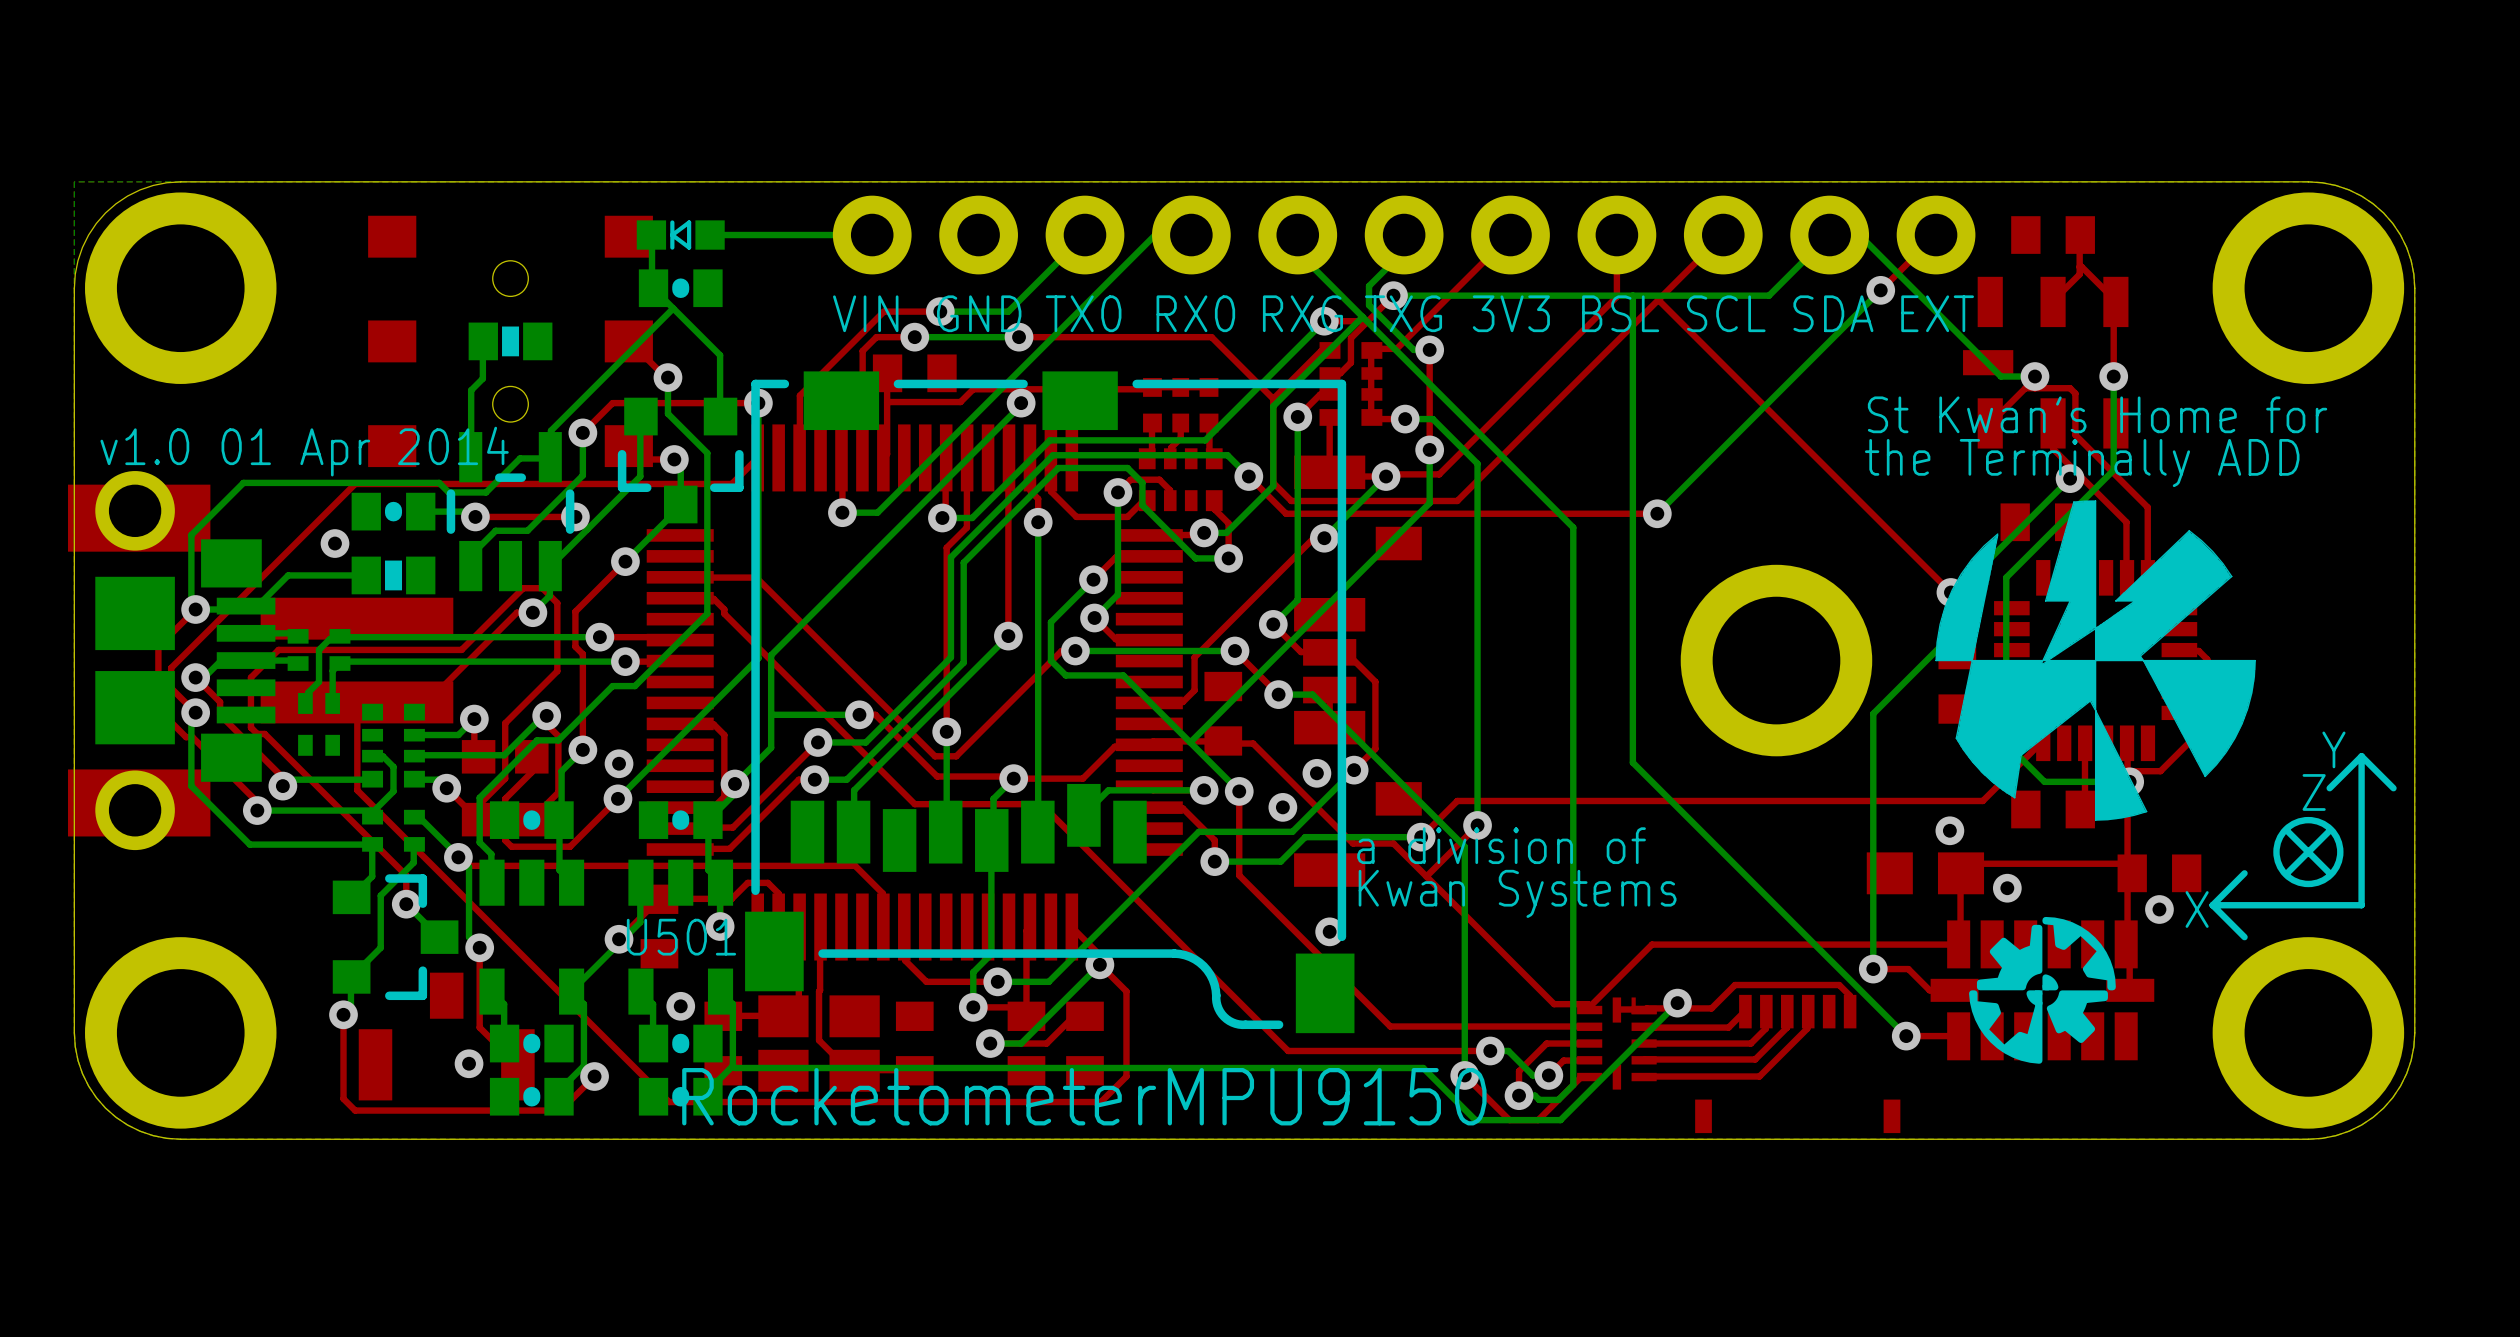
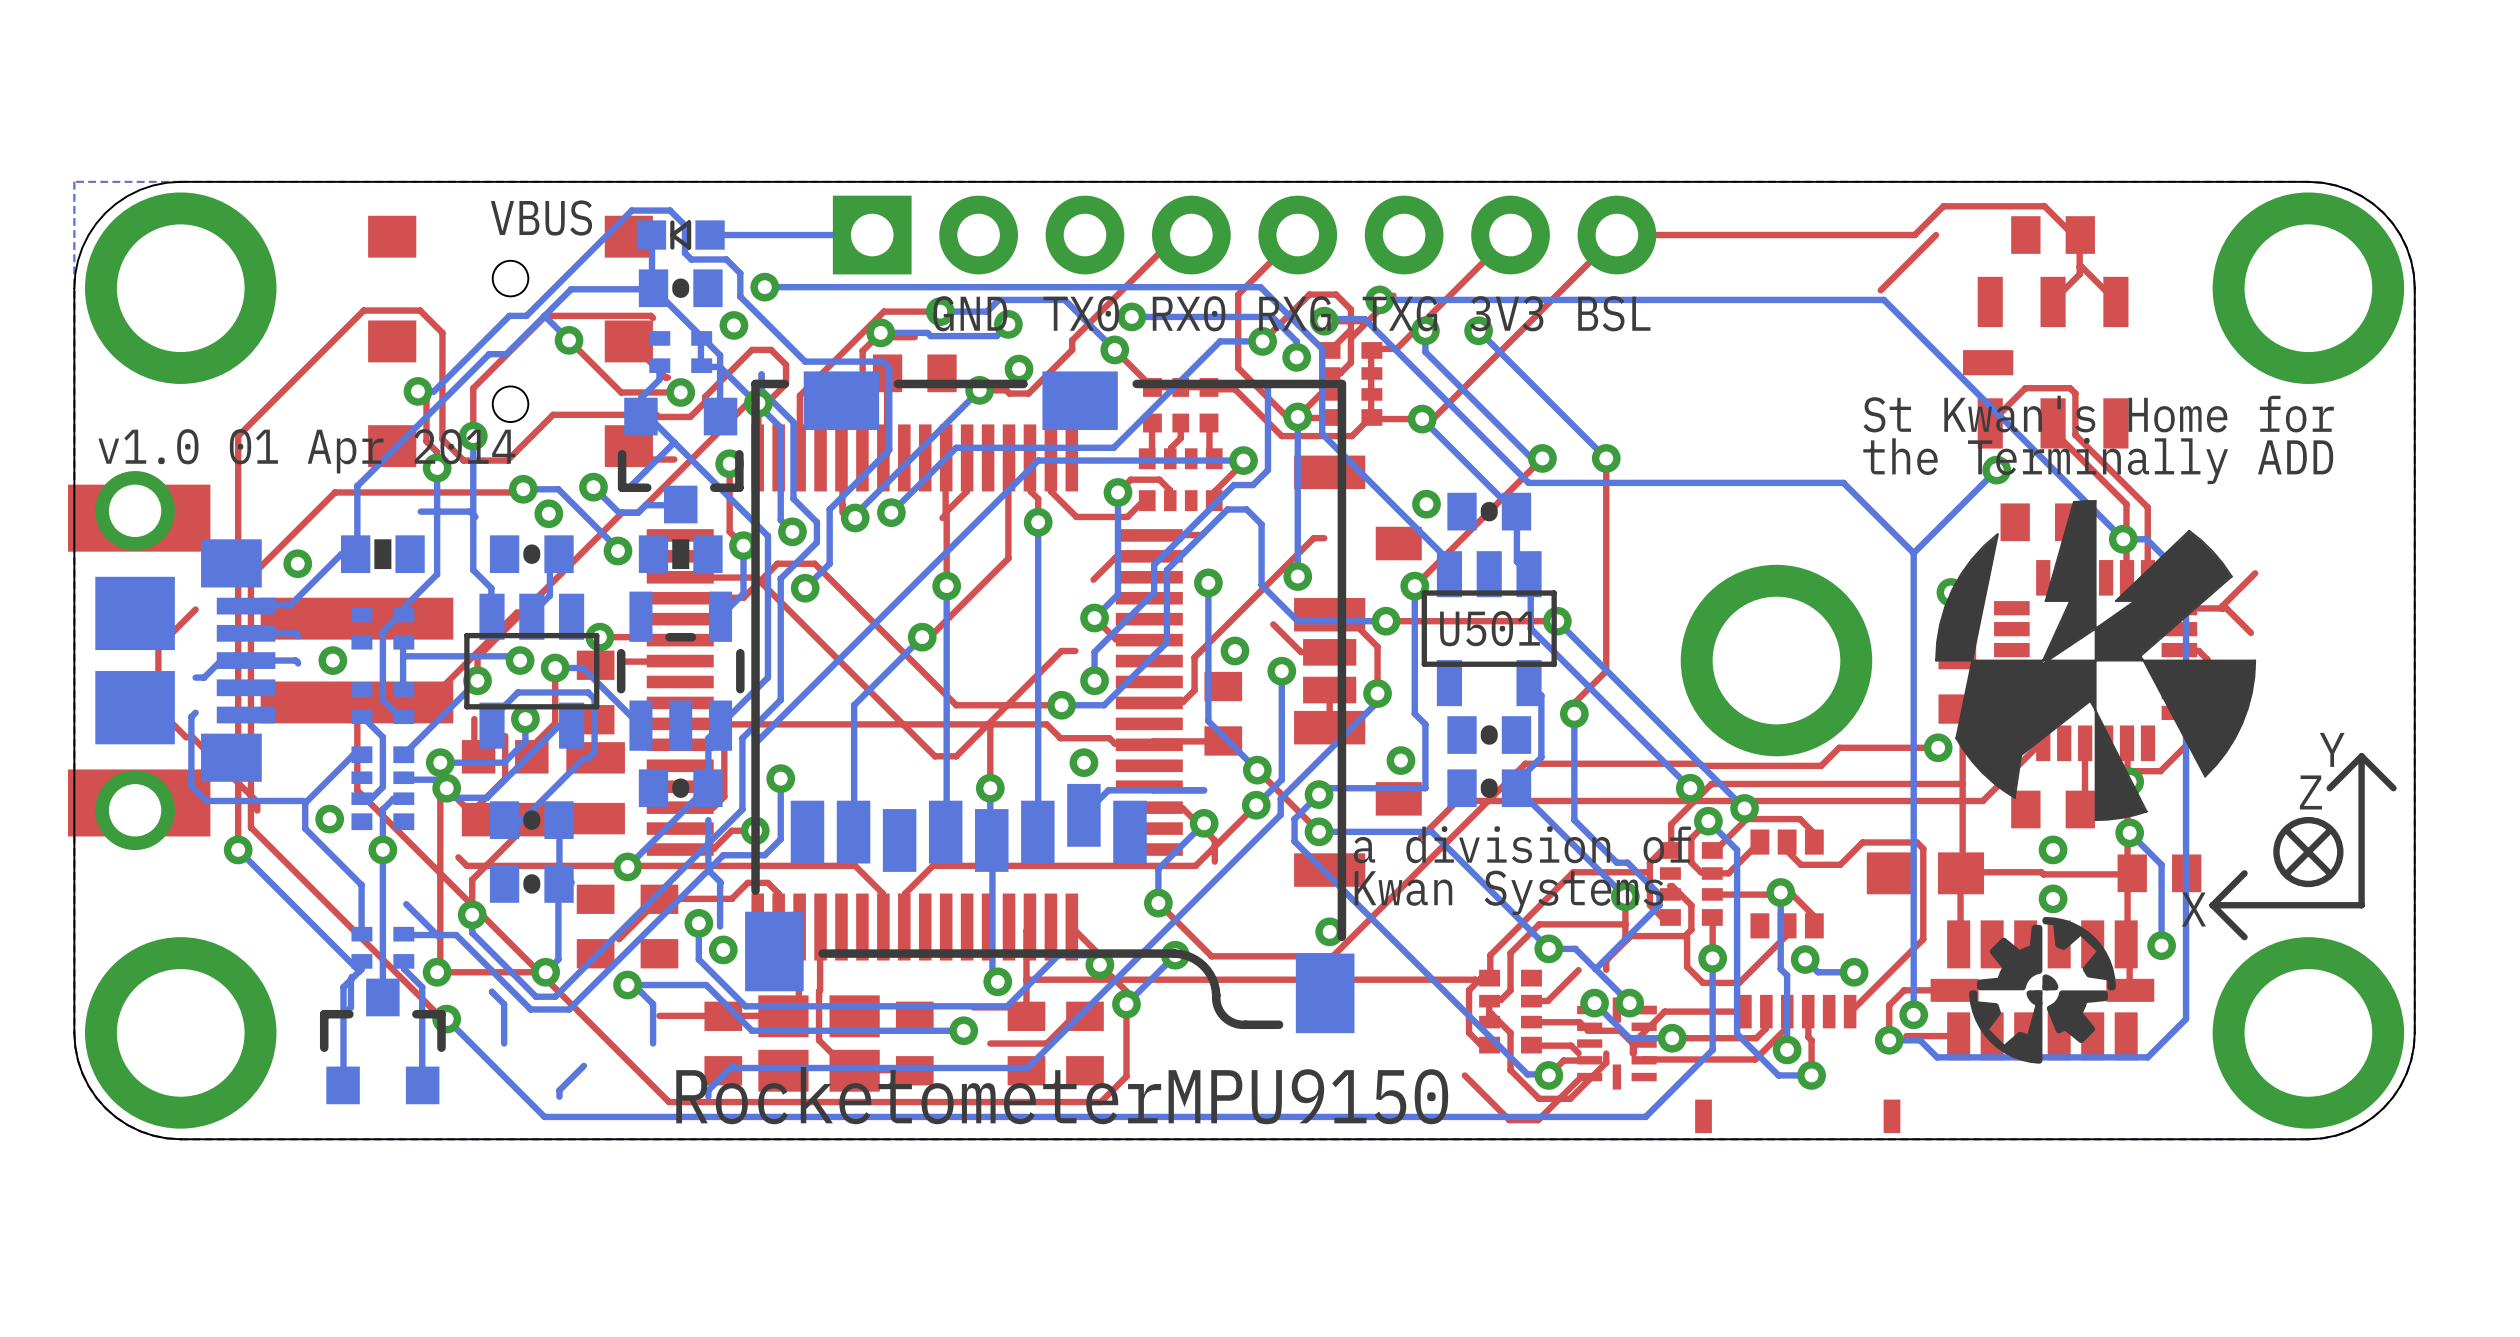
text: none -> VBUS (541, 218)
bottom track: (1084, 235) (1008, 311) (987, 311) -> (1114, 349) (1064, 299) (998, 299) (987, 311)
top track: none -> (1191, 235) (1177, 235) (1072, 340) (1072, 349) (1028, 393) (1009, 393) (1006, 390) (979, 390)
bottom track: (1191, 235) (1155, 235) (877, 512) (842, 512) -> none
part: none -> (1244, 235)
bottom track: (1297, 235) (1297, 252) (1364, 319) -> (1326, 319) (1364, 319)
bottom track: (1404, 235) (1404, 250) (1369, 286) (1369, 305) (1413, 349) (1429, 349) -> none
part: (1404, 235) -> none
top track: (1616, 235) (1616, 296) (1439, 474) (1333, 476) (1329, 472) (1329, 418) -> (1297, 235) (1238, 294) (1238, 368) (1288, 418) (1329, 418)
top track: (1723, 235) (1457, 500) (1291, 500) (1273, 482) (1273, 398) -> none
top track: none -> (2080, 235) (2071, 232) (2044, 206) (1943, 206) (1914, 235) (1616, 235) (1432, 419) (1405, 419)
bottom track: none -> (764, 287) (1260, 287) (1322, 348) (1322, 433) (1448, 560) (1449, 574)
via: none -> (764, 287)
bottom track: (1880, 290) (1657, 513) -> none
via: (1880, 290) -> none
bottom track: (1393, 295) (1769, 295) (1829, 235) (1831, 237) (1861, 237) (2000, 376) (2034, 376) -> none
via position: (1393, 295) -> (1379, 299)
bottom track: (1632, 295) (1632, 762) (1906, 1036) -> none
bottom track: none -> (1379, 299) (1883, 299) (2123, 539) (2146, 539) (2186, 578) (2186, 1019) (2147, 1057) (1937, 1057) (1920, 1040) (1889, 1040)
top track: (1658, 299) (1950, 592) -> none
top track: (2115, 301) (2113, 304) (2113, 376) -> none
bottom track: (673, 308) (550, 430) (550, 457) (520, 458) (486, 492) (448, 492) (439, 482) (243, 482) (191, 535) (191, 605) (195, 609) (241, 609) (243, 607) -> none
text: VIN (865, 313) -> none
text: SCL (1726, 313) -> none
text: SDA (1833, 313) -> none
text: EXT (1937, 313) -> none
bottom track: none -> (544, 315) (569, 340)
bottom track: none -> (1131, 316) (1272, 316) (1296, 341) (1296, 357)
via: none -> (1131, 316)
bottom track: (1362, 316) (1273, 406) (1273, 486) (1226, 532) (1204, 532) -> none
top track: none -> (653, 318) (650, 315) (545, 315) (473, 388) (473, 436)
bottom track: (1324, 321) (1205, 440) (1049, 440) (972, 518) (942, 518) -> none
bottom track: none -> (1008, 324) (996, 336) (930, 336) (927, 332) (880, 332)
via: none -> (733, 325)
bottom track: none -> (1425, 330) (1425, 352) (1531, 458) (1542, 458)
bottom track: none -> (1478, 330) (1606, 458)
via: none -> (1478, 330)
via position: (914, 337) -> (880, 332)
top track: (1019, 337) (1211, 337) (1273, 398) -> none
bottom track: (1019, 337) (914, 337) -> none
via position: (1019, 337) -> (1008, 324)
bottom track: none -> (701, 338) (701, 365) (720, 366) (780, 427) (780, 520) (792, 531)
top track: none -> (569, 340) (621, 392) (680, 392)
via: none -> (569, 340)
bottom track: (482, 341) (482, 378) (471, 390) (470, 457) -> none
part: (510, 341) -> none
bottom track: none -> (1262, 341) (1220, 341) (1113, 447) (956, 447) (891, 512)
via: none -> (1262, 341)
via: none -> (1114, 349)
top track: (1429, 349) (1429, 449) -> none
via position: (1429, 349) -> (1425, 330)
top track: (1329, 350) (1321, 350) (1273, 398) -> (1330, 350) (1350, 329) (1350, 309) (1336, 294) (1309, 294) (1262, 341)
part: none -> (680, 352)
via: none -> (1296, 357)
bottom track: none -> (659, 365) (659, 379) (641, 397) (641, 415)
via: none -> (1019, 369)
top track: none -> (761, 374) (761, 389) (638, 512) (622, 512) (477, 657) (477, 680)
bottom track: none -> (761, 374) (761, 390) (793, 422) (793, 498) (816, 522) (816, 542) (780, 578) (780, 699) (742, 738) (742, 809) (555, 996) (536, 996) (472, 932) (472, 914)
via: (2034, 376) -> none
bottom track: (2113, 376) (2113, 470) (2006, 577) (2006, 739) (1996, 741) (2004, 741) (2044, 781) (2129, 781) -> none
via: (2113, 376) -> none
bottom track: (667, 377) (667, 413) (707, 453) (707, 613) (634, 686) (612, 686) (558, 740) (537, 740) (479, 797) (479, 842) (491, 854) (492, 882) -> none
via position: (667, 377) -> (680, 392)
bottom track: none -> (1262, 382) (1267, 388) (1267, 470) (1253, 485) (1233, 485) (1154, 564) (1154, 592) (1094, 652) (1094, 680)
top track: (1152, 387) (1149, 389) (973, 389) (960, 402) (887, 402) -> (1152, 387) (1114, 349)
top track: none -> (1209, 387) (1211, 389) (1234, 389) (1281, 436) (1352, 436) (1371, 417)
bottom track: none -> (979, 390) (855, 514) (855, 518)
via: none -> (979, 390)
top track: none -> (417, 391) (426, 399) (426, 441) (437, 452) (437, 468)
bottom track: none -> (417, 391) (433, 391) (509, 315) (526, 315) (631, 210) (670, 210) (684, 225) (684, 253) (691, 259) (726, 259) (740, 273) (740, 296) (805, 361) (882, 361) (889, 368) (889, 449) (829, 509) (829, 563) (805, 588)
via: none -> (417, 391)
top track: (758, 403) (612, 403) (582, 432) -> none
bottom track: (758, 403) (758, 658) (617, 798) -> none
bottom track: (1021, 403) (771, 655) (771, 747) (734, 783) (734, 793) (707, 820) -> none
via: (1021, 403) -> none
bottom track: (640, 416) (640, 476) -> (674, 442) (640, 476)
bottom track: none -> (640, 416) (647, 415) (767, 536) (767, 677) (708, 738) (708, 788)
bottom track: (1405, 419) (1432, 419) (1477, 463) (1477, 825) -> none
via position: (1405, 419) -> (1422, 419)
bottom track: none -> (1422, 419) (1516, 511)
top track: (2053, 430) (2053, 448) (2126, 522) -> (2053, 430) (2126, 504) (2126, 522)
bottom track: (582, 432) (582, 475) (527, 530) (495, 530) (471, 555) (471, 565) -> none
via: (582, 432) -> none
bottom track: none -> (473, 436) (473, 570) (491, 588) (492, 616)
via: none -> (473, 436)
bottom track: (1429, 449) (1429, 503) (1190, 742) -> none
via: (1429, 449) -> none
top track: (757, 458) (731, 483) (355, 483) (171, 668) (171, 688) (195, 712) -> (757, 457) (758, 411) (786, 383) (786, 364) (771, 349) (752, 349) (705, 396) (705, 402) (690, 416) (658, 416) (656, 414) (553, 414) (507, 460) (463, 460) (442, 439) (442, 332) (420, 310) (363, 310) (238, 436) (238, 849)
top track: none -> (1542, 458) (1414, 586)
via: none -> (1542, 458)
top track: none -> (1606, 458) (1606, 671) (1574, 703) (1574, 713)
via: none -> (1606, 458)
bottom track: (674, 459) (680, 465) (679, 507) (625, 561) -> none
via: (674, 459) -> none
bottom track: none -> (1243, 460) (1038, 460) (755, 743) (755, 830)
top track: none -> (729, 463) (729, 531) (743, 545)
via: none -> (729, 463)
bottom track: none -> (437, 468) (437, 574) (405, 606) (403, 615) (398, 615) (382, 631) (382, 699) (398, 715) (403, 716)
via: none -> (437, 468)
bottom track: none -> (1996, 470) (1913, 553)
via: none -> (1996, 470)
top track: (1248, 476) (1286, 513) (1657, 513) -> none
bottom track: (1248, 476) (1227, 455) (1053, 455) (950, 557) (950, 657) (865, 742) (817, 742) -> none
via position: (1248, 476) -> (1243, 460)
bottom track: (1386, 476) (1324, 538) -> none
via: (1386, 476) -> none
bottom track: (2070, 478) (1953, 595) -> none
via: (2070, 478) -> none
bottom track: (1528, 482) (1573, 527) (1573, 1085) (1558, 1099) (1539, 1099) (1534, 1095) (1519, 1095) -> (1528, 482) (1843, 482) (1913, 553)
bottom track: none -> (593, 487) (619, 512) (638, 512) (645, 505) (680, 505)
via: none -> (593, 487)
bottom track: (628, 488) (550, 565) -> none
bottom track: none -> (523, 489) (558, 489) (617, 550)
via: none -> (523, 489)
top track: (966, 491) (966, 527) (946, 547) -> (966, 491) (946, 511) (946, 547)
top track: (1214, 500) (1214, 509) (1228, 523) (1228, 558) -> (1214, 500) (1214, 491) (1243, 460)
via: none -> (1426, 504)
part position: (393, 511) -> (531, 554)
part position: (510, 511) -> (680, 671)
part: none -> (1489, 511)
bottom track: none -> (1516, 511) (1516, 561) (1530, 576) (1530, 628) (1690, 788)
via position: (842, 512) -> (855, 518)
via: none -> (891, 512)
via: (1657, 513) -> none
via: (475, 516) -> none
top track: (575, 516) (475, 516) -> none
via position: (575, 516) -> (548, 513)
via: (942, 518) -> none
via: none -> (792, 531)
via: (1204, 532) -> none
via: (1324, 538) -> none
via: none -> (2123, 539)
via position: (334, 543) -> (297, 563)
bottom track: none -> (743, 545) (743, 593) (720, 616)
via: none -> (743, 545)
bottom track: none -> (1913, 553) (1913, 1014)
part: none -> (680, 554)
top track: (1008, 558) (1008, 636) -> (1008, 558) (929, 637) (922, 637)
bottom track: (1228, 558) (1195, 558) (1142, 505) (1142, 482) (1127, 468) (1058, 468) (963, 562) (963, 662) (846, 779) (814, 779) -> none
via position: (1228, 558) -> (1208, 582)
top track: (625, 561) (575, 611) (575, 646) (582, 654) (582, 749) -> none
via position: (625, 561) -> (617, 550)
top track: none -> (2255, 573) (2222, 608)
bottom track: (366, 575) (288, 575) (258, 605) -> (653, 288) (571, 289) (506, 354) (489, 354) (357, 486) (357, 552) (355, 554) (341, 554) (290, 605) (258, 605)
part position: (393, 575) -> (382, 554)
bottom track: (1297, 576) (1297, 599) (1273, 624) -> none
via: none -> (1297, 576)
bottom track: (1093, 579) (1050, 622) (1050, 660) (1065, 675) (1123, 675) (1239, 791) -> none
via: (1093, 579) -> none
bottom track: none -> (1208, 582) (1208, 721) (1257, 770)
top track: (946, 586) (946, 731) -> none
bottom track: none -> (946, 586) (946, 731)
via: none -> (946, 586)
via: none -> (1414, 586)
via: none -> (805, 588)
bottom track: (1953, 595) (1953, 633) (1873, 713) (1873, 969) -> none
top track: (680, 598) (713, 598) (724, 609) (724, 613) (914, 804) (1041, 804) (1288, 1050) (1490, 1050) -> (680, 597) (743, 597) (777, 563) (814, 563) (956, 705) (1061, 705)
top track: none -> (2179, 608) (2226, 608) (2250, 632)
via: (195, 609) -> none
via: (532, 612) -> none
top track: none -> (1329, 614) (1345, 614) (1377, 646) (1377, 693)
bottom track: none -> (1386, 621) (1297, 621) (1261, 585) (1261, 524) (1246, 509) (1227, 509) (1166, 570) (1166, 642) (1104, 705) (1061, 705)
via: none -> (1386, 621)
top track: none -> (1557, 621) (1386, 621)
bottom track: none -> (1557, 621) (1744, 808)
via: none -> (1557, 621)
via: (1273, 624) -> none
part: none -> (382, 628)
bottom track: (1008, 636) (854, 790) -> (922, 637) (854, 705) (854, 790)
via: (1008, 636) -> none
bottom track: (599, 637) (339, 636) (329, 639) (319, 649) (319, 681) (308, 692) (308, 703) (305, 703) -> none
via: none -> (922, 637)
bottom track: none -> (403, 642) (403, 689)
part: (319, 649) -> none
via: (1075, 650) -> none
top track: (1234, 650) (1278, 694) -> none
bottom track: (1234, 650) (1075, 650) -> none
top track: (1329, 652) (1331, 654) (1347, 654) (1375, 681) (1375, 748) (1354, 770) -> none
bottom track: none -> (403, 656) (515, 656) (520, 660)
via: none -> (332, 660)
via: none -> (520, 660)
bottom track: (625, 661) (342, 661) (332, 670) (332, 703) -> none
via: (625, 661) -> none
bottom track: none -> (555, 668) (582, 668) (640, 725)
via: none -> (555, 668)
part: none -> (531, 671)
bottom track: none -> (1281, 671) (1281, 779) (1256, 805)
top track: (195, 677) (220, 702) (220, 714) (282, 777) (282, 786) -> none
via: (195, 677) -> none
top track: (250, 677) (278, 649) (461, 649) (523, 588) (542, 588) (557, 603) (557, 671) (505, 723) (505, 736) -> (250, 677) (250, 576) (334, 492) (520, 492) (523, 489)
bottom track: none -> (477, 680) (404, 754)
via: none -> (477, 680)
via: none -> (1094, 680)
bottom track: none -> (1529, 683) (1541, 695) (1541, 757) (1516, 781) (1516, 788)
part: none -> (595, 692)
via: none -> (1377, 693)
bottom track: (1278, 694) (1312, 694) (1464, 846) (1464, 1075) -> none
via position: (1278, 694) -> (1281, 671)
part: none -> (382, 703)
via: none -> (1061, 705)
via: (195, 712) -> none
bottom track: none -> (1574, 713) (1574, 820) (1616, 862) (1627, 862) (1659, 894) (1659, 905) (1595, 969)
via: none -> (1574, 713)
top track: (859, 714) (875, 714) (937, 776) (1082, 778) (1114, 746) (1146, 746) (1149, 744) -> (713, 724) (1046, 724) (1060, 738) (1109, 738) (1114, 743) (1149, 744)
bottom track: (859, 714) (771, 714) -> none
via: (859, 714) -> none
top track: (546, 715) (546, 724) (558, 736) (558, 792) (531, 819) -> (472, 914) (472, 879) (531, 820)
bottom track: (546, 715) (543, 715) (504, 755) (414, 756) -> none
via position: (546, 715) -> (525, 719)
bottom track: none -> (362, 716) (382, 737) (382, 787) (372, 797) (361, 798)
bottom track: (474, 719) (458, 735) (414, 735) -> none
via: (474, 719) -> none
bottom track: none -> (525, 719) (525, 741) (504, 762) (440, 762)
part: (319, 724) -> none
top track: none -> (990, 724) (990, 788)
bottom track: none -> (492, 725) (492, 718) (517, 692) (588, 692) (594, 698) (594, 752) (588, 758) (583, 758) (511, 830) (504, 830)
bottom track: none -> (571, 725) (558, 726) (487, 797) (440, 797)
top track: (250, 727) (257, 733) (264, 733) (406, 875) (406, 904) -> (250, 727) (250, 827) (442, 1019) (446, 1019)
via: (946, 731) -> none
part: none -> (1489, 735)
top track: (1223, 740) (1225, 743) (1253, 743) (1353, 843) (1393, 843) (1554, 1004) (1588, 1004) (1590, 1006) -> none
top track: (817, 742) (732, 827) (680, 828) -> none
via: (817, 742) -> none
part position: (393, 745) -> (382, 788)
top track: none -> (1938, 747) (1839, 747) (1821, 765) (1525, 763) (1332, 956) (1211, 956) (1158, 903)
via: none -> (1938, 747)
bottom track: (582, 749) (561, 771) (561, 818) (559, 820) -> none
via: (582, 749) -> none
bottom track: none -> (361, 755) (353, 755) (305, 803)
bottom track: (373, 756) (382, 756) (393, 766) (393, 791) (373, 811) (373, 816) -> none
top track: (531, 756) (531, 772) (505, 798) (505, 840) (511, 846) (570, 846) (617, 798) -> (531, 756) (531, 746) (555, 723) (555, 668)
via: none -> (1400, 760)
via: none -> (440, 762)
via: none -> (1083, 762)
via: (619, 763) -> none
top track: none -> (1257, 770) (1319, 831)
via: none -> (1257, 770)
bottom track: (1354, 770) (1292, 831) (1198, 831) (1048, 981) (997, 981) -> none
via: (1354, 770) -> none
via position: (1316, 773) -> (1319, 794)
bottom track: none -> (780, 778) (780, 839) (764, 855) (723, 855) (569, 1009) (530, 1009) (456, 935) (403, 934)
via: none -> (780, 778)
bottom track: (1013, 778) (993, 798) (993, 838) (991, 841) (991, 954) (973, 972) (973, 1007) -> none
via position: (1013, 778) -> (990, 788)
bottom track: (372, 779) (289, 779) (282, 786) -> none
top track: (814, 779) (798, 779) (729, 848) (713, 848) -> (755, 830) (731, 830) (713, 848)
via: (814, 779) -> none
via: (734, 783) -> none
top track: none -> (1962, 783) (1711, 783) (1671, 824) (1670, 850)
via: (282, 786) -> none
part: none -> (595, 788)
bottom track: none -> (707, 788) (627, 866)
bottom track: none -> (990, 788) (990, 838) (992, 841) (992, 981)
part: none -> (1489, 788)
bottom track: none -> (1516, 788) (1625, 896)
via: none -> (1690, 788)
via: (1204, 790) -> none
top track: (1239, 791) (1239, 875) (1390, 1026) (1589, 1026) -> none
via: (1239, 791) -> none
top track: none -> (440, 797) (440, 969) (437, 972) (545, 972)
bottom track: none -> (403, 798) (393, 798) (382, 809) (382, 997)
via: (617, 798) -> none
bottom track: (206, 800) (249, 844) (372, 844) -> (206, 800) (303, 800) (305, 803)
bottom track: none -> (305, 803) (305, 828) (361, 885) (361, 933)
via: none -> (1256, 805)
via: (1282, 807) -> none
via: none -> (1744, 808)
bottom track: (257, 810) (371, 810) (372, 817) -> none
via: (257, 810) -> none
bottom track: (414, 817) (420, 818) (469, 866) (469, 937) (479, 947) -> none
via: none -> (329, 819)
top track: none -> (1746, 819) (1715, 849) (1712, 849)
top track: none -> (1746, 819) (1799, 819) (1813, 832) (1814, 842)
part position: (680, 820) -> (680, 788)
top track: none -> (1708, 821) (1691, 838) (1691, 862) (1700, 872) (1712, 873)
bottom track: none -> (1708, 821) (1737, 849) (1737, 1033) (1778, 1075) (1811, 1075)
via: none -> (1708, 821)
bottom track: none -> (1204, 823) (1158, 869) (1158, 903)
via: none -> (1204, 823)
top track: (1477, 825) (1426, 876) -> none
via: (1477, 825) -> none
part: (393, 830) -> none
via: none -> (755, 830)
via: (1949, 830) -> none
bottom track: none -> (1319, 831) (1431, 831) (1548, 948) (1575, 948) (1629, 1003)
via: none -> (1319, 831)
bottom track: none -> (2129, 832) (2161, 864) (2161, 945)
via: none -> (2129, 832)
bottom track: (1421, 837) (1305, 837) (1280, 861) (1214, 861) -> none
via: (1421, 837) -> none
top track: none -> (1759, 842) (1728, 873) (1712, 873)
bottom track: (372, 844) (372, 876) (352, 896) -> none
bottom track: (413, 844) (413, 862) (380, 895) (380, 947) (352, 976) -> none
bottom track: none -> (238, 849) (359, 971)
via: none -> (238, 849)
via: none -> (382, 849)
via: none -> (2053, 849)
top track: none -> (1670, 850) (1661, 850) (1649, 862) (1649, 905) (1661, 916) (1670, 916)
via: (458, 857) -> none
U501 footprint: [628, 859, 734, 1015] -> [1421, 551, 1557, 707]
via: (1214, 861) -> none
via: none -> (627, 866)
top track: none -> (1649, 872) (1573, 872) (1490, 955) (1489, 978)
top track: (2132, 873) (2125, 863) (1972, 863) (1961, 873) -> (2132, 873) (1961, 873) (1962, 871) (1962, 714) (1957, 709)
part footprint: [332, 874, 459, 1001] -> [351, 926, 415, 969]
bottom track: (640, 882) (640, 922) (571, 991) (583, 1004) (583, 1065) (594, 1076) -> none
part: none -> (531, 883)
bottom track: none -> (558, 883) (558, 959) (545, 972)
part: none -> (1691, 883)
part: none -> (1787, 883)
top track: none -> (1670, 886) (1691, 905) (1691, 929) (1684, 936)
via: (2007, 888) -> none
bottom track: none -> (1780, 892) (1780, 969) (1787, 975) (1787, 1049)
via: none -> (1780, 892)
top track: none -> (1712, 894) (1792, 894) (1813, 915) (1813, 925)
top track: none -> (1625, 896) (1625, 937) (1627, 939)
via: none -> (1625, 896)
via: none -> (2053, 898)
via: none -> (1158, 903)
via: (406, 904) -> none
via position: (2159, 909) -> (2161, 945)
via: none -> (472, 914)
top track: none -> (1712, 917) (1712, 958)
bottom track: none -> (698, 923) (698, 959) (745, 1006) (1007, 1006) (1058, 955) (1099, 955)
via: none -> (698, 923)
top track: none -> (1625, 924) (1539, 924) (1510, 953) (1510, 990) (1500, 999) (1489, 1001) (1489, 1022)
top track: none -> (1787, 925) (1787, 935) (1739, 982) (1703, 982) (1687, 966) (1687, 938) (1684, 936)
part: none -> (595, 926)
via: (720, 926) -> none
top track: (904, 927) (905, 960) (926, 981) (992, 981) -> (904, 927) (905, 893) (932, 865) (1195, 865) (1256, 805)
top track: none -> (1684, 936) (1630, 936) (1606, 960) (1606, 969)
part: (531, 937) -> none
via: (619, 939) -> none
top track: (1958, 944) (1652, 944) (1590, 1006) -> none
top track: (479, 947) (479, 1027) (517, 1064) -> none
via: (479, 947) -> none
via: none -> (1548, 948)
via: none -> (723, 949)
bottom track: none -> (1175, 955) (1126, 1004)
via: none -> (1175, 955)
bottom track: none -> (1712, 958) (1712, 1049) (1645, 1116) (544, 1116) (446, 1019)
via: none -> (1712, 958)
bottom track: none -> (1805, 959) (1817, 972) (1854, 972)
via: none -> (1805, 959)
bottom track: none -> (361, 961) (361, 969) (343, 987) (343, 1085)
bottom track: none -> (404, 961) (404, 969) (422, 987) (422, 1085)
bottom track: (1099, 964) (1021, 1043) (990, 1043) -> none
top track: (1873, 969) (1908, 969) (1929, 990) -> (1889, 1040) (1889, 1005) (1904, 990) (1929, 990)
via position: (1873, 969) -> (1854, 972)
top track: none -> (1578, 970) (1547, 1000) (1531, 1000)
via: none -> (437, 972)
via: none -> (545, 972)
top track: none -> (1489, 978) (1480, 978) (1469, 990) (1469, 1032) (1480, 1044) (1489, 1044)
top track: none -> (1026, 979) (1475, 979) (1477, 981)
bottom track: none -> (627, 985) (706, 985) (752, 1030) (963, 1030)
via: none -> (627, 985)
bottom track: (720, 991) (732, 1004) (732, 1065) -> none
bottom track: none -> (1594, 1003) (1629, 1038) (1672, 1038)
via: none -> (1594, 1003)
via: none -> (1629, 1003)
bottom track: (1677, 1003) (1560, 1120) (1475, 1120) (1423, 1068) (1027, 1068) -> (1377, 693) (1377, 702) (1280, 798) (1280, 814) (1027, 1068)
via: (1677, 1003) -> none
via: none -> (1126, 1004)
via: (680, 1006) -> none
via: (973, 1007) -> none
top track: (1644, 1010) (1646, 1008) (1711, 1008) (1734, 985) (1839, 985) (1849, 995) (1849, 1011) -> (1787, 842) (1787, 850) (1800, 864) (1840, 864) (1862, 842) (1916, 842) (1923, 848) (1923, 939) (1850, 1011)
part: none -> (1510, 1011)
top track: (1744, 1011) (1728, 1027) (1644, 1026) -> (1744, 1011) (1664, 1011) (1634, 1041) (1633, 1053)
top track: (1808, 1011) (1807, 1028) (1759, 1076) (1644, 1076) -> (1808, 1011) (1808, 1037) (1811, 1040) (1811, 1075)
top track: none -> (1489, 1013) (1510, 1032) (1510, 1070) (1539, 1098) (1570, 1098) (1606, 1062) (1606, 1053)
top track: (343, 1014) (343, 1098) (355, 1110) (560, 1110) (594, 1076) -> none
via: (343, 1014) -> none
via: none -> (1913, 1014)
top track: none -> (659, 1015) (723, 1016)
via: none -> (446, 1019)
top track: none -> (1531, 1022) (1579, 1022) (1588, 1030) (1620, 1030) (1632, 1043) (1632, 1053)
via: none -> (963, 1030)
part: (446, 1036) -> none
via: (1906, 1036) -> none
via: none -> (1672, 1038)
top track: (1756, 1038) (1750, 1043) (1644, 1043) -> (1756, 1038) (1672, 1038)
via: none -> (1889, 1040)
part: none -> (382, 1041)
part: (531, 1043) -> none
part: (680, 1043) -> none
via: (990, 1043) -> none
top track: (1589, 1043) (1546, 1043) (1519, 1071) (1519, 1095) -> none
top track: none -> (1531, 1045) (1571, 1045) (1578, 1053)
via: none -> (1787, 1049)
bottom track: (1490, 1050) (1508, 1050) (1532, 1075) (1548, 1075) -> (1414, 586) (1414, 713) (1425, 724) (1425, 788) (1325, 788) (1294, 819) (1294, 841) (1527, 1074) (1548, 1074)
via: (1490, 1050) -> none
via: (469, 1063) -> none
via: (1464, 1075) -> none
via: none -> (1811, 1075)
via: (594, 1076) -> none
via: (1519, 1095) -> none
part: (531, 1096) -> none
part: (680, 1096) -> none

